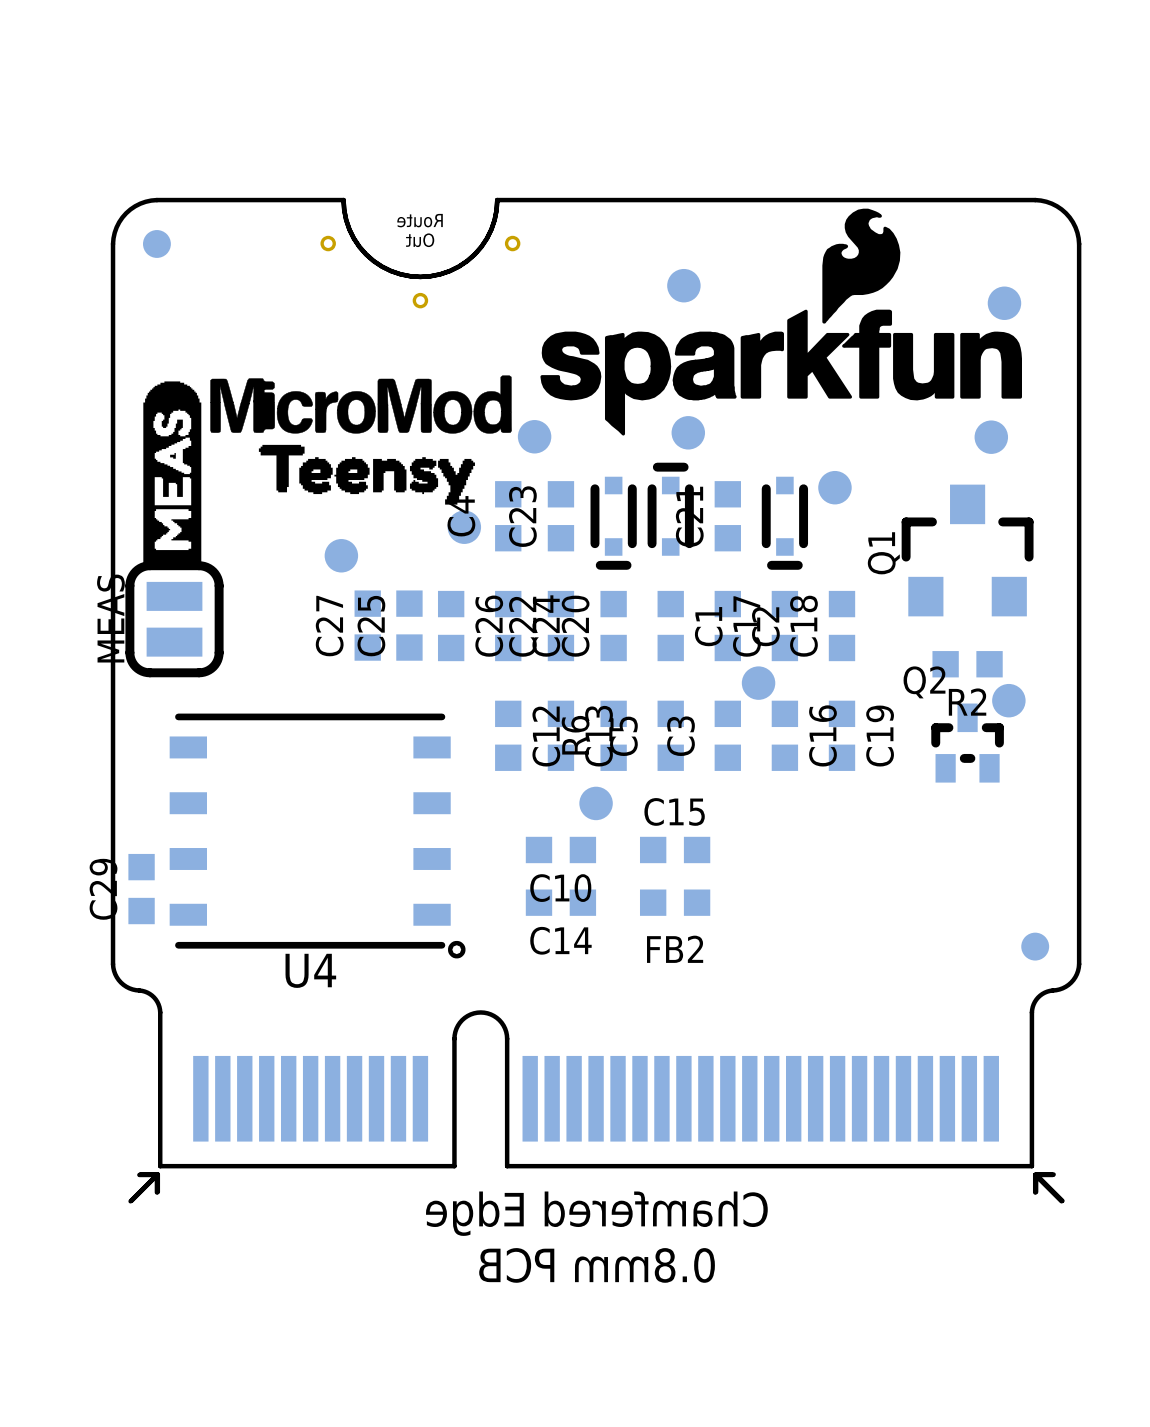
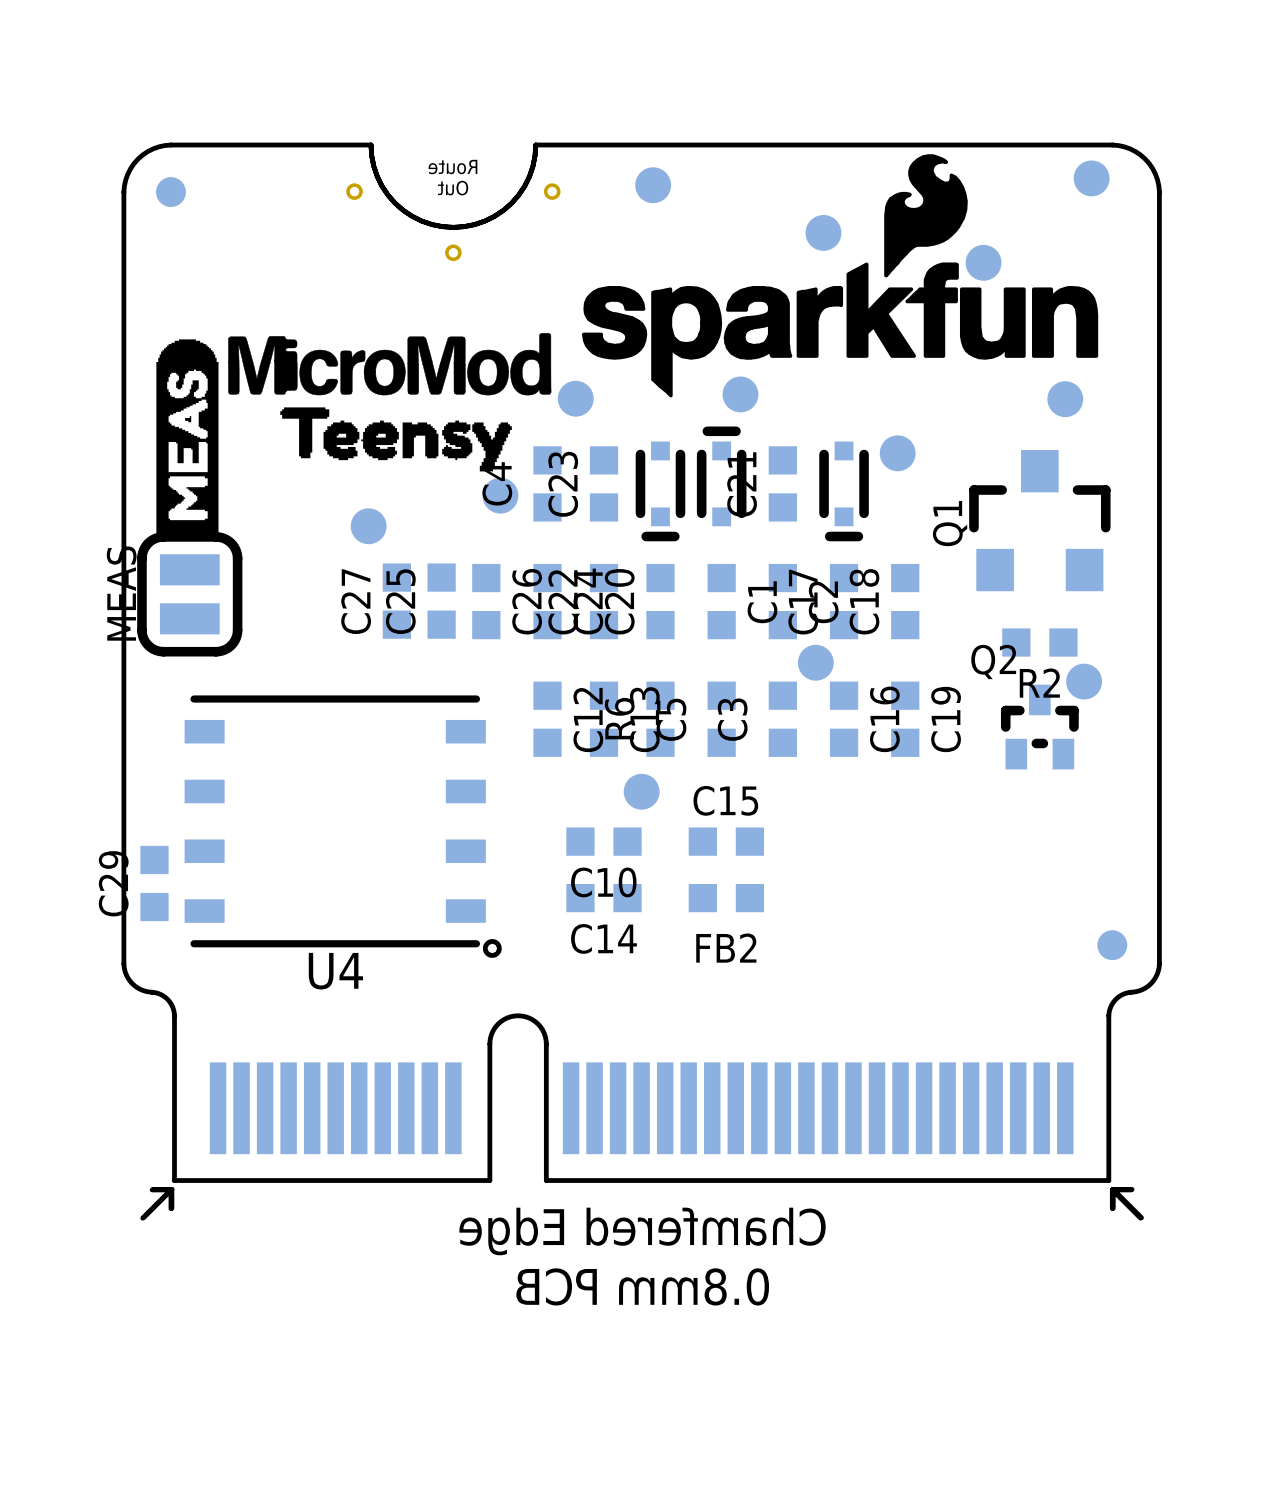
part: none -> (1091, 178)
part: none -> (653, 185)
part: none -> (823, 232)
part: (683, 285) -> none
part: (1004, 303) -> none
part: none -> (983, 262)

